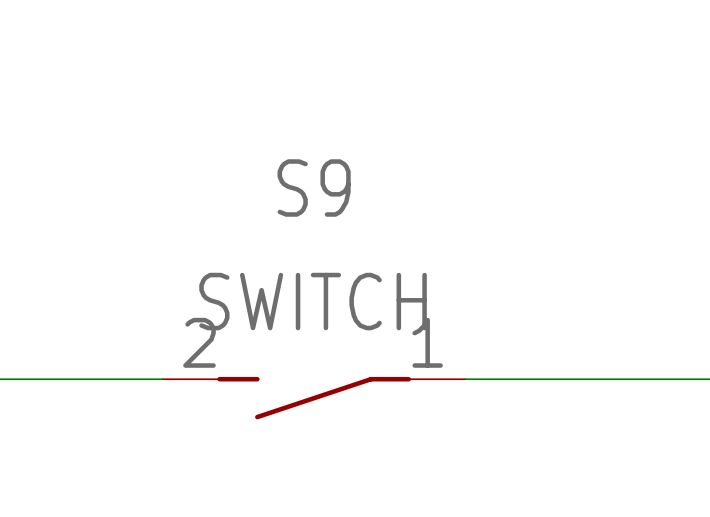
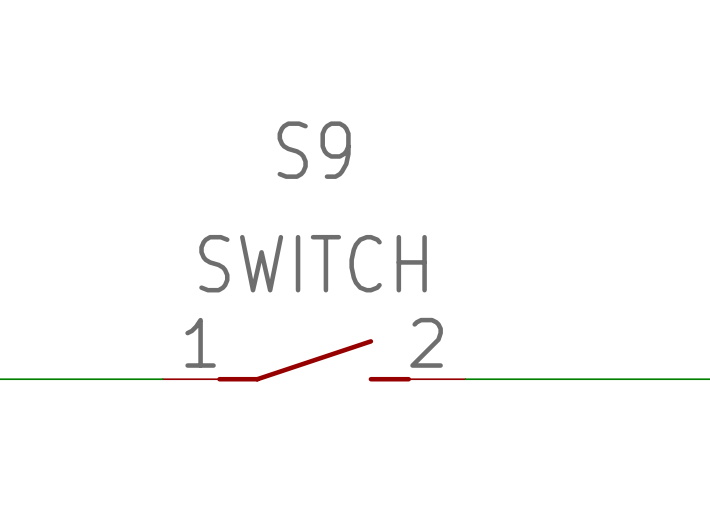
S9 rotation: 0° (314, 398) -> 180° (314, 360)

